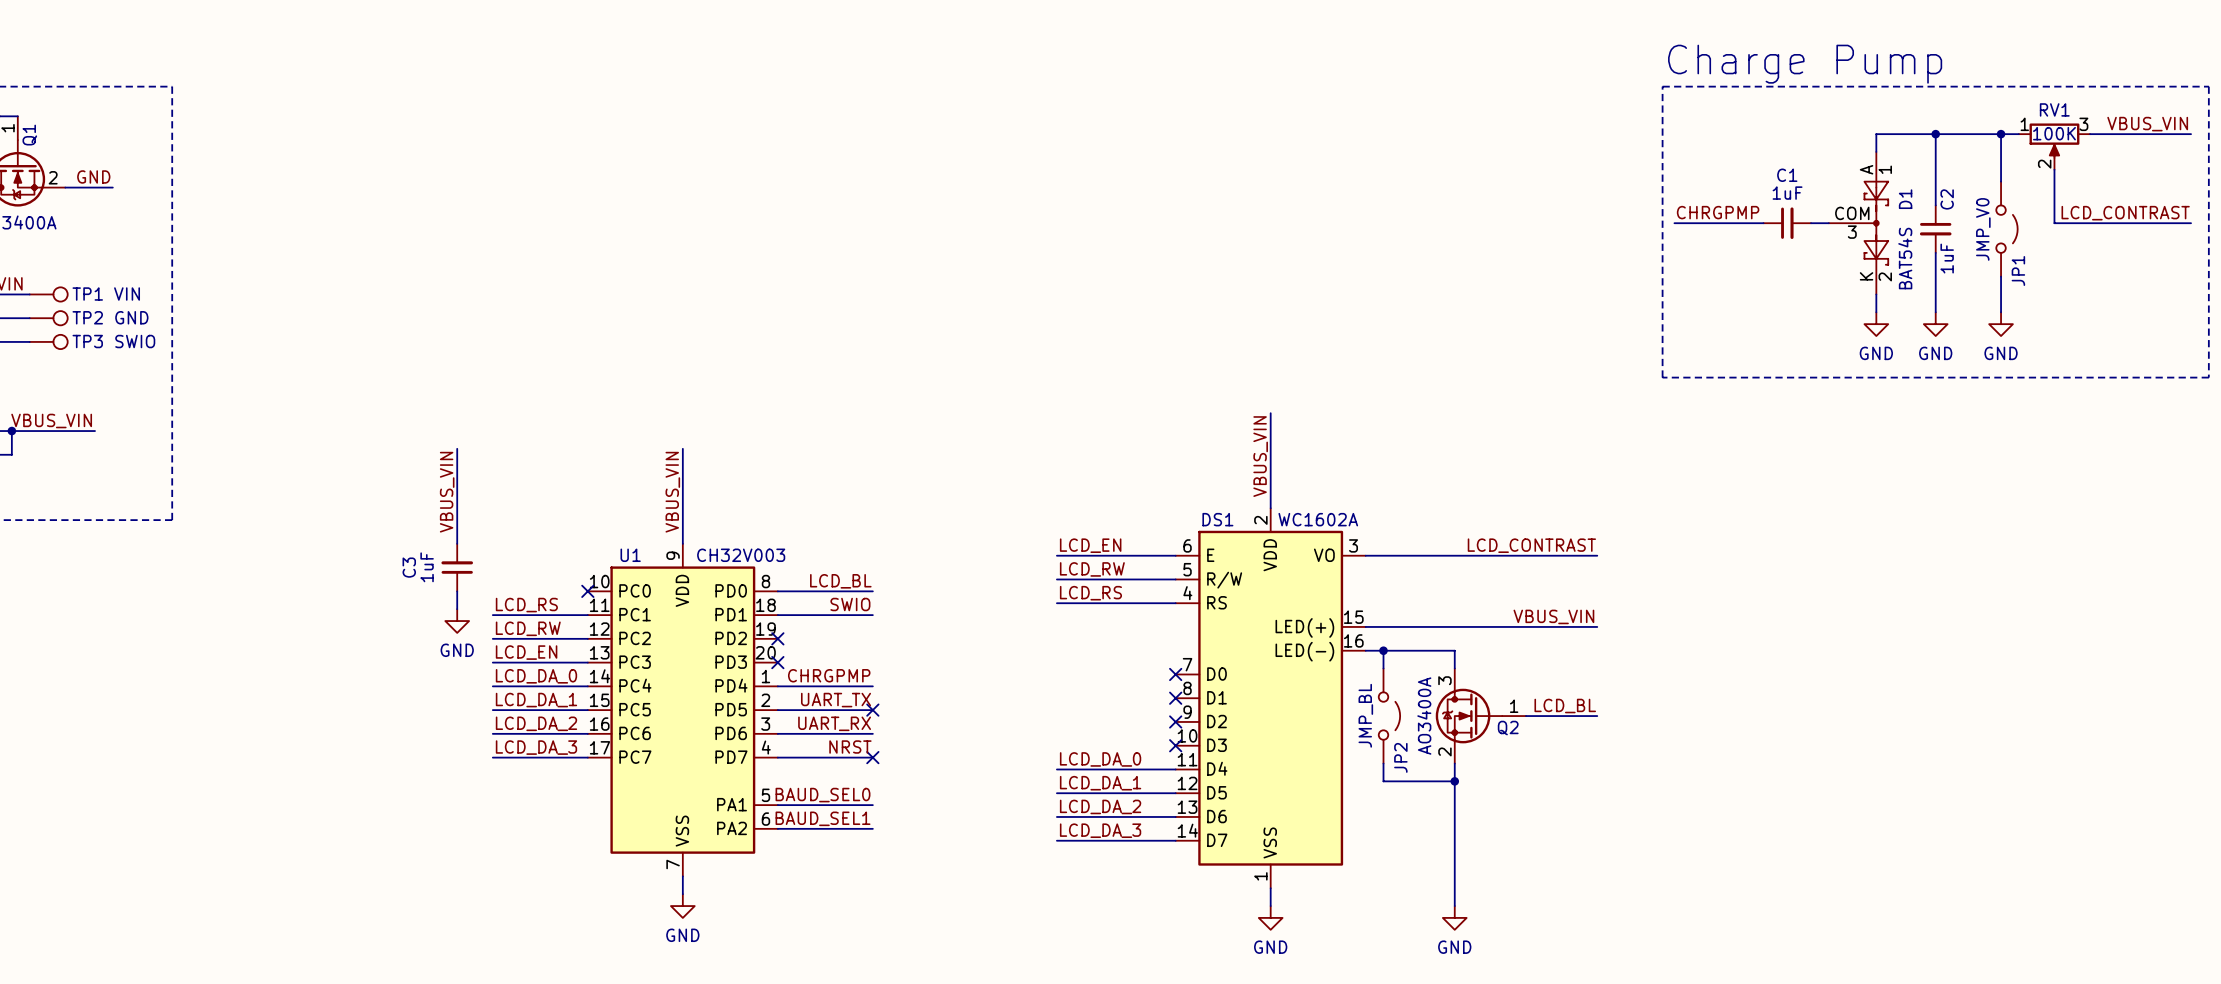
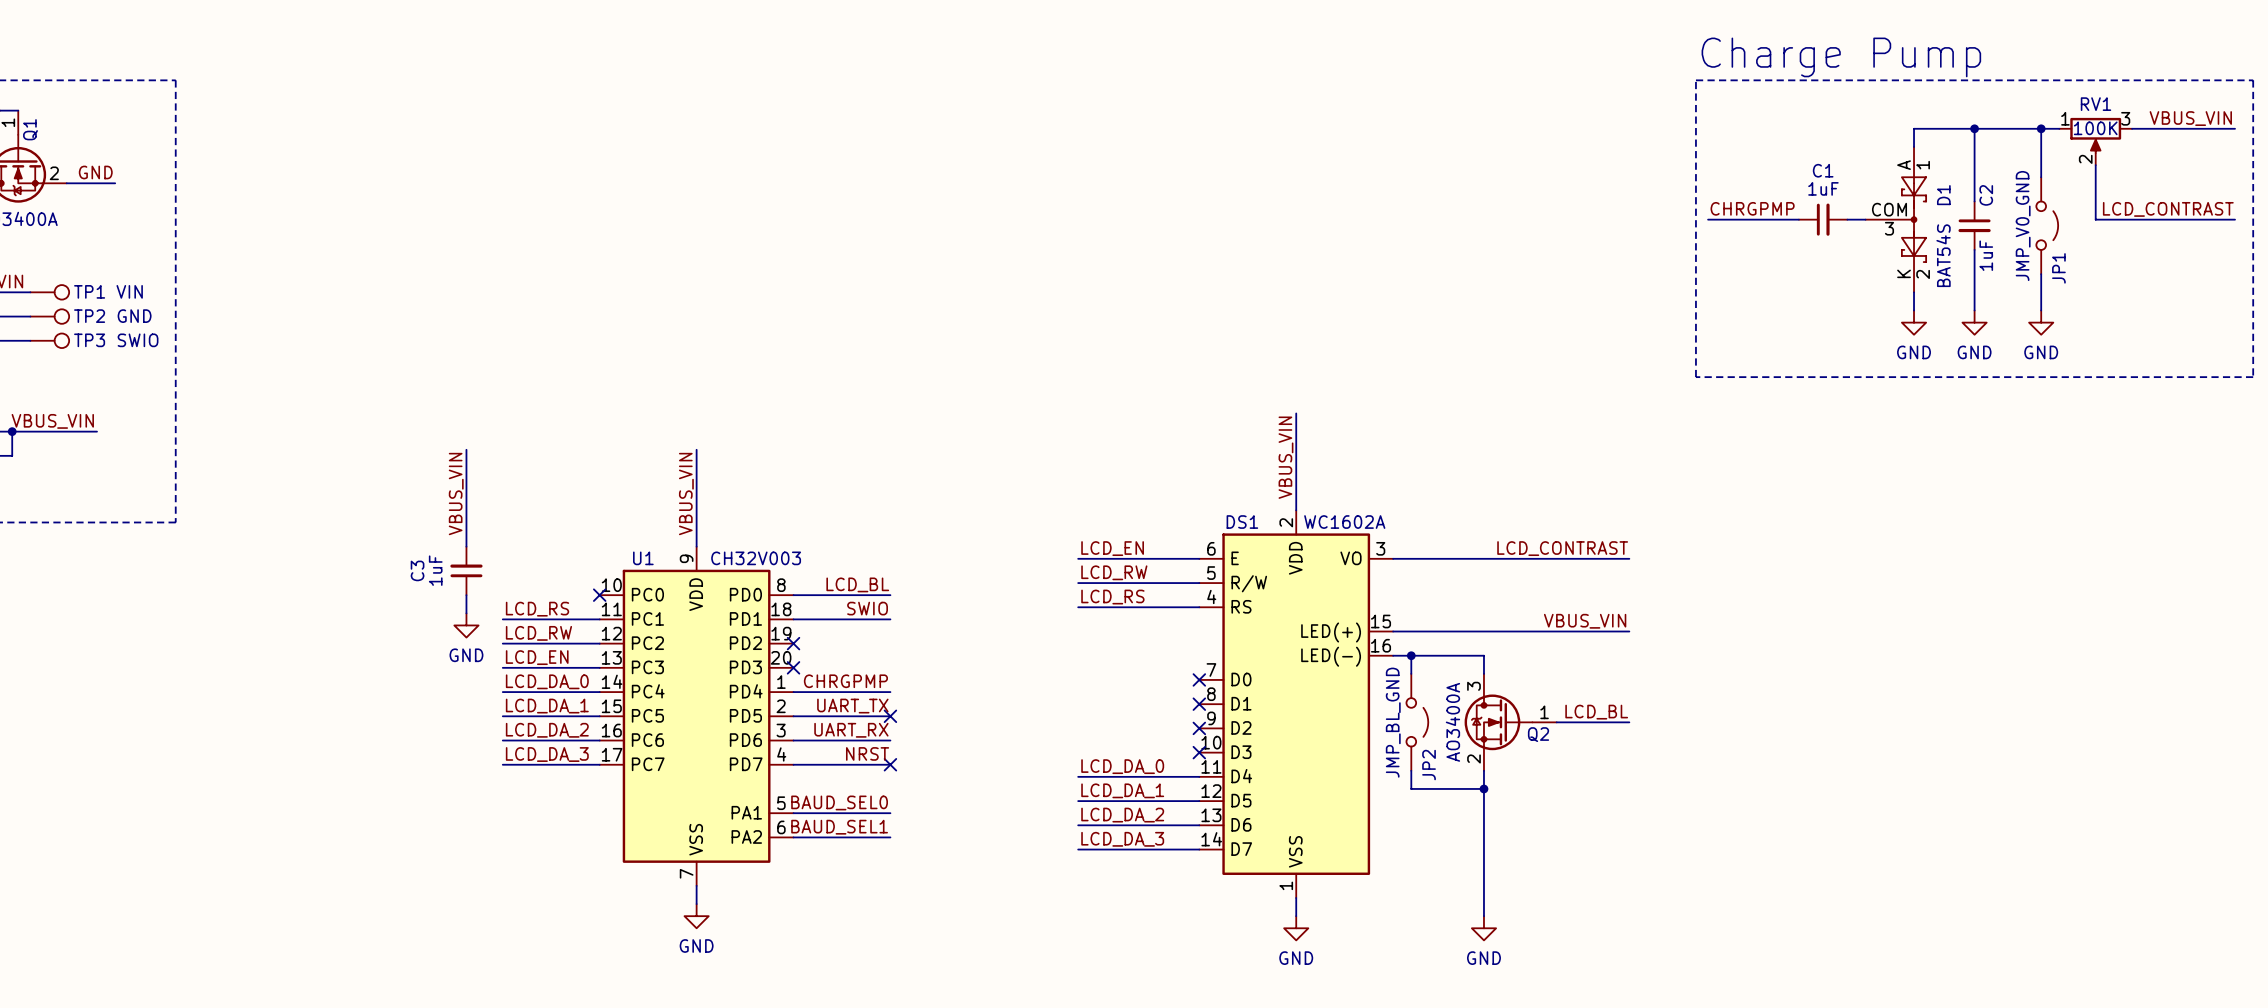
JP1 value: JMP_V0 (1983, 229) -> JMP_V0_GND (2023, 225)
JP2 value: JMP_BL (1365, 715) -> JMP_BL_GND (1393, 722)

